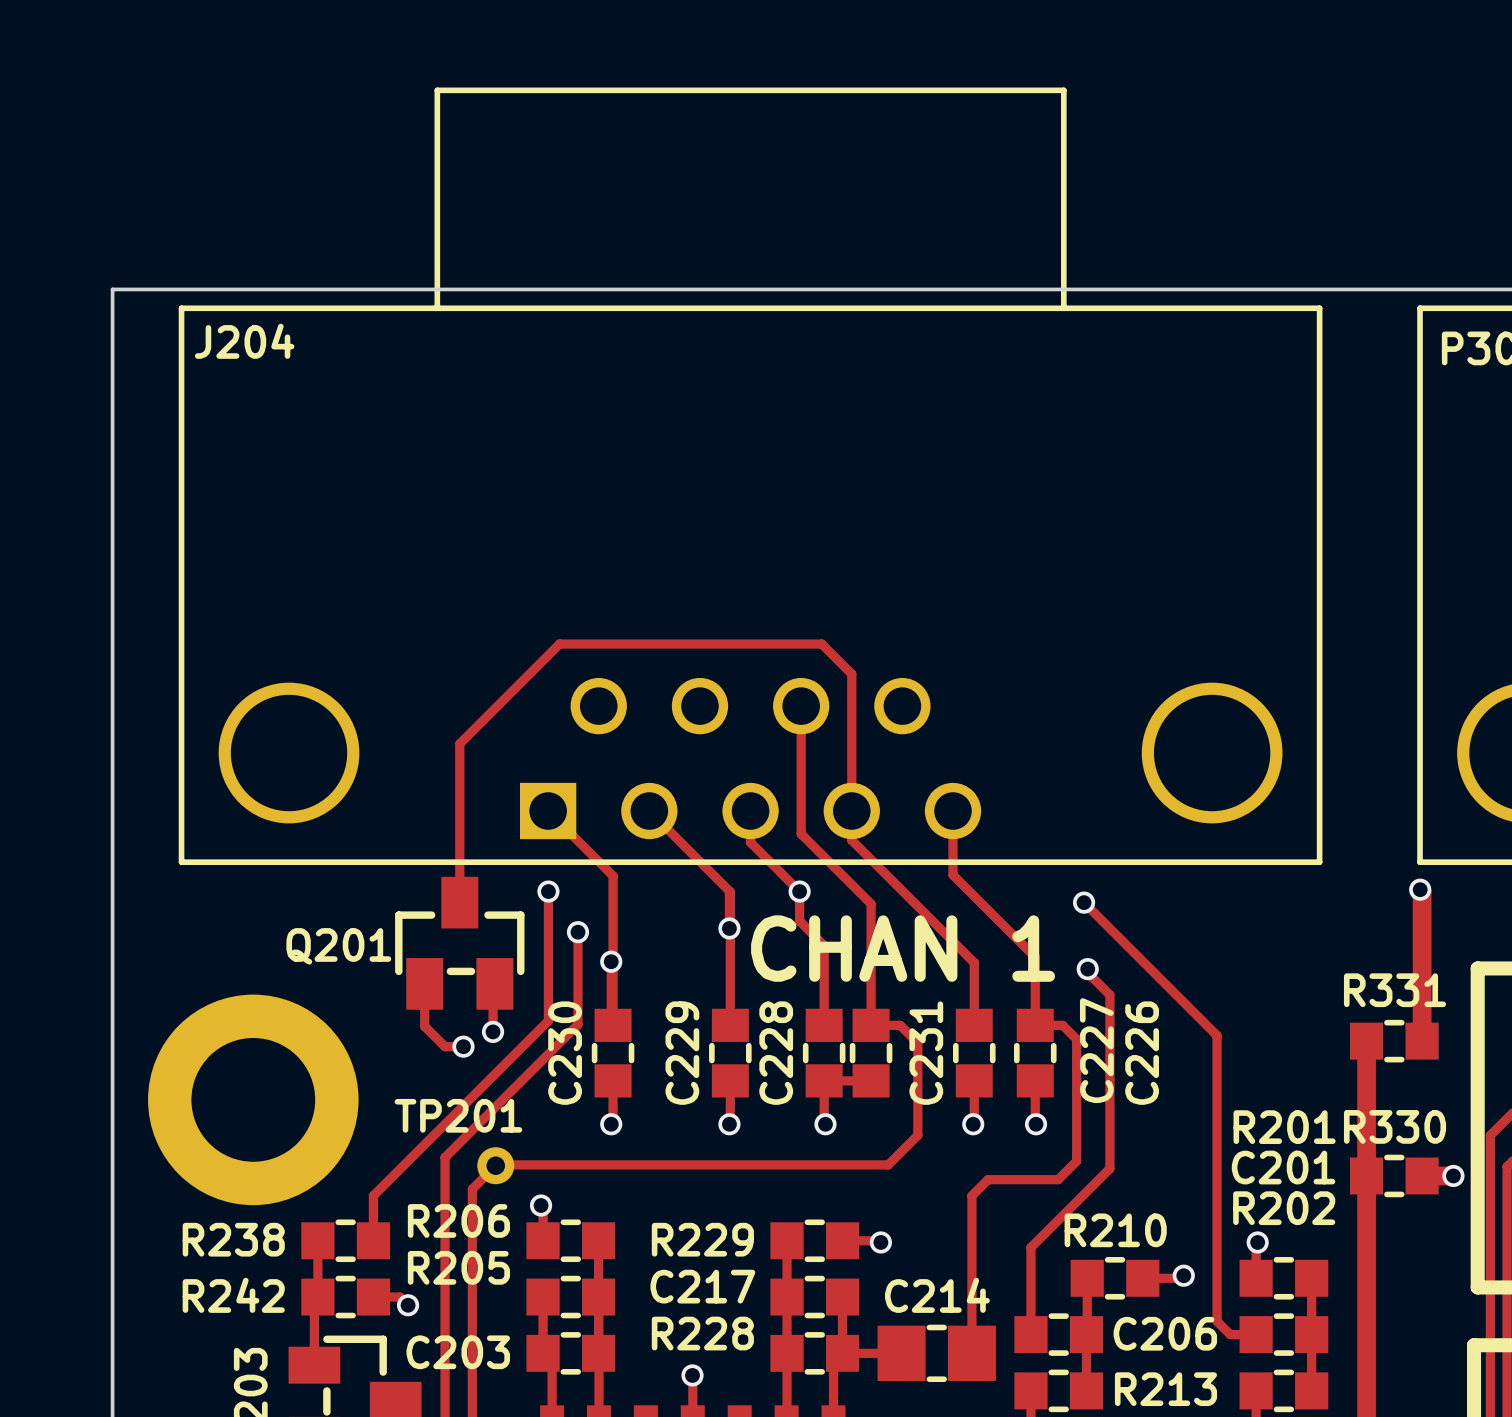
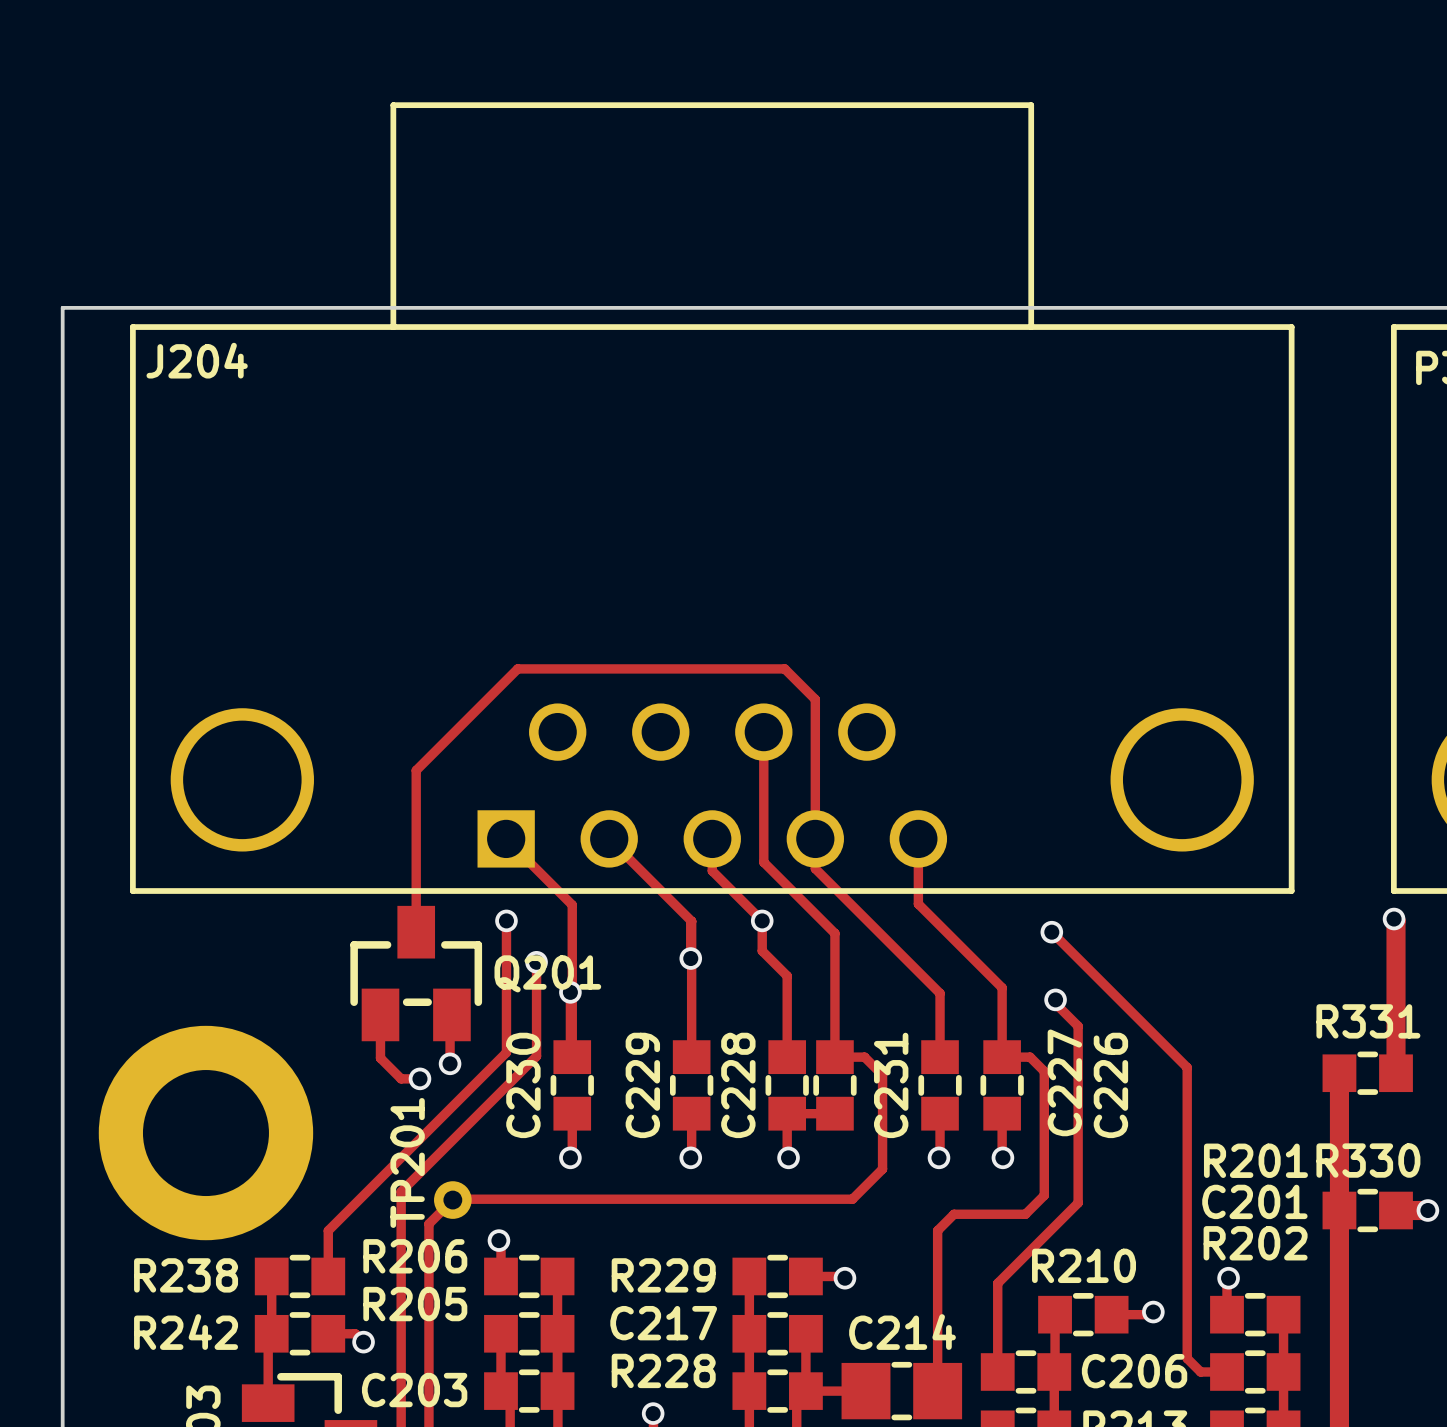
Q201 name position: Q201 (338, 946) -> Q201 (547, 973)
text: CHAN 1 (903, 948) -> none
TP201 name rotation: 0° (458, 1115) -> 90° counterclockwise (407, 1162)

